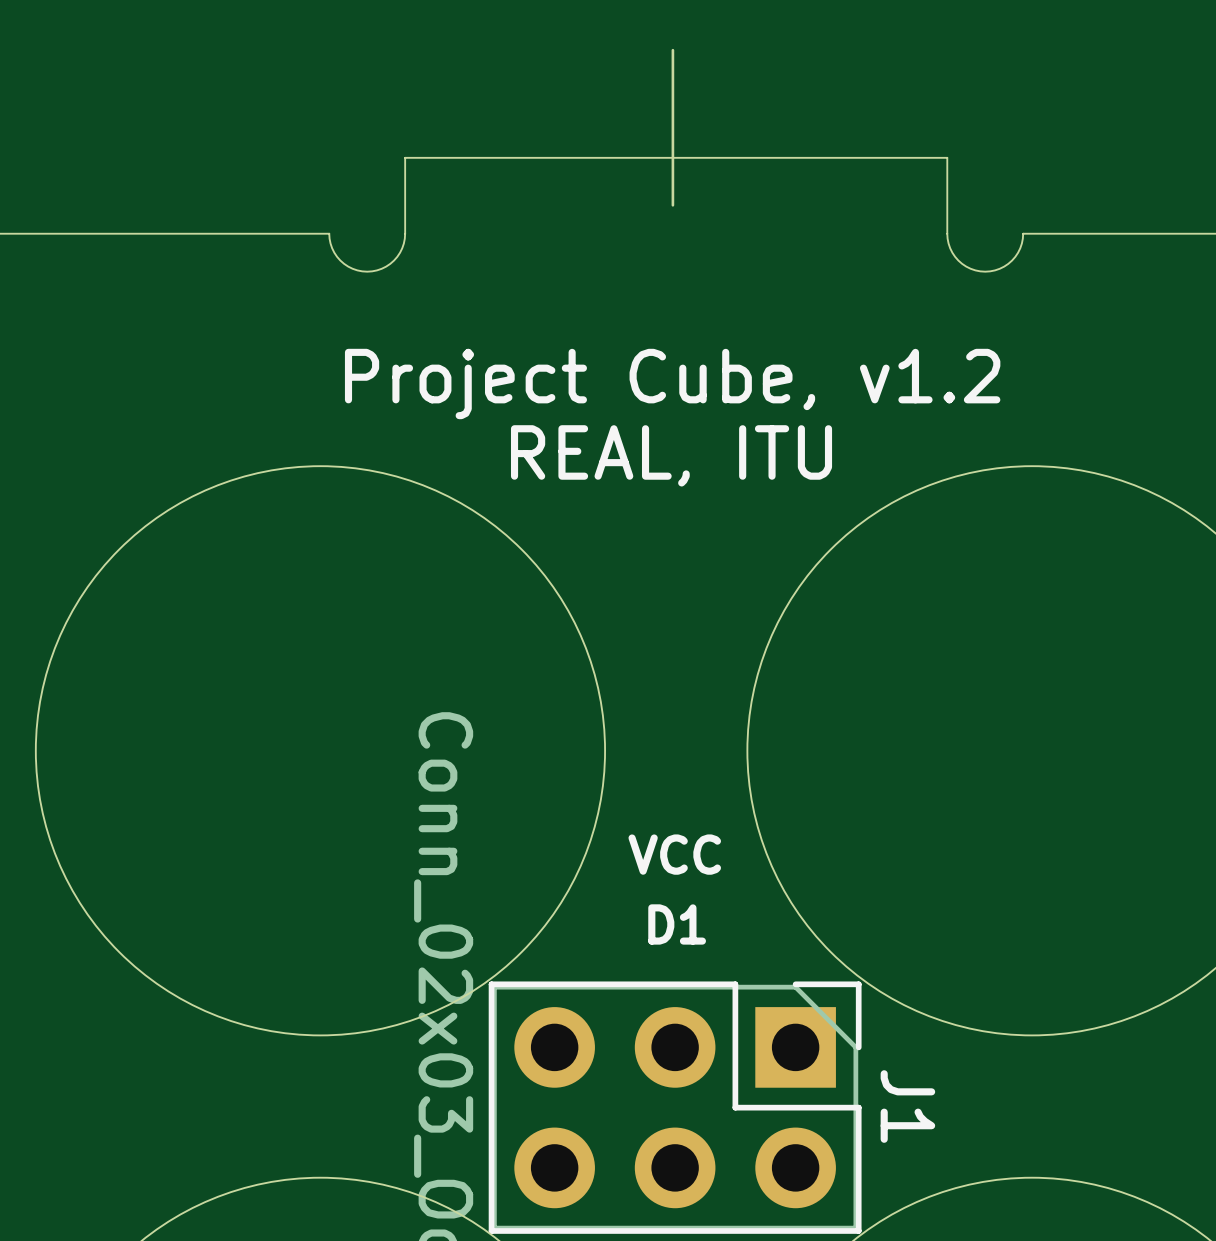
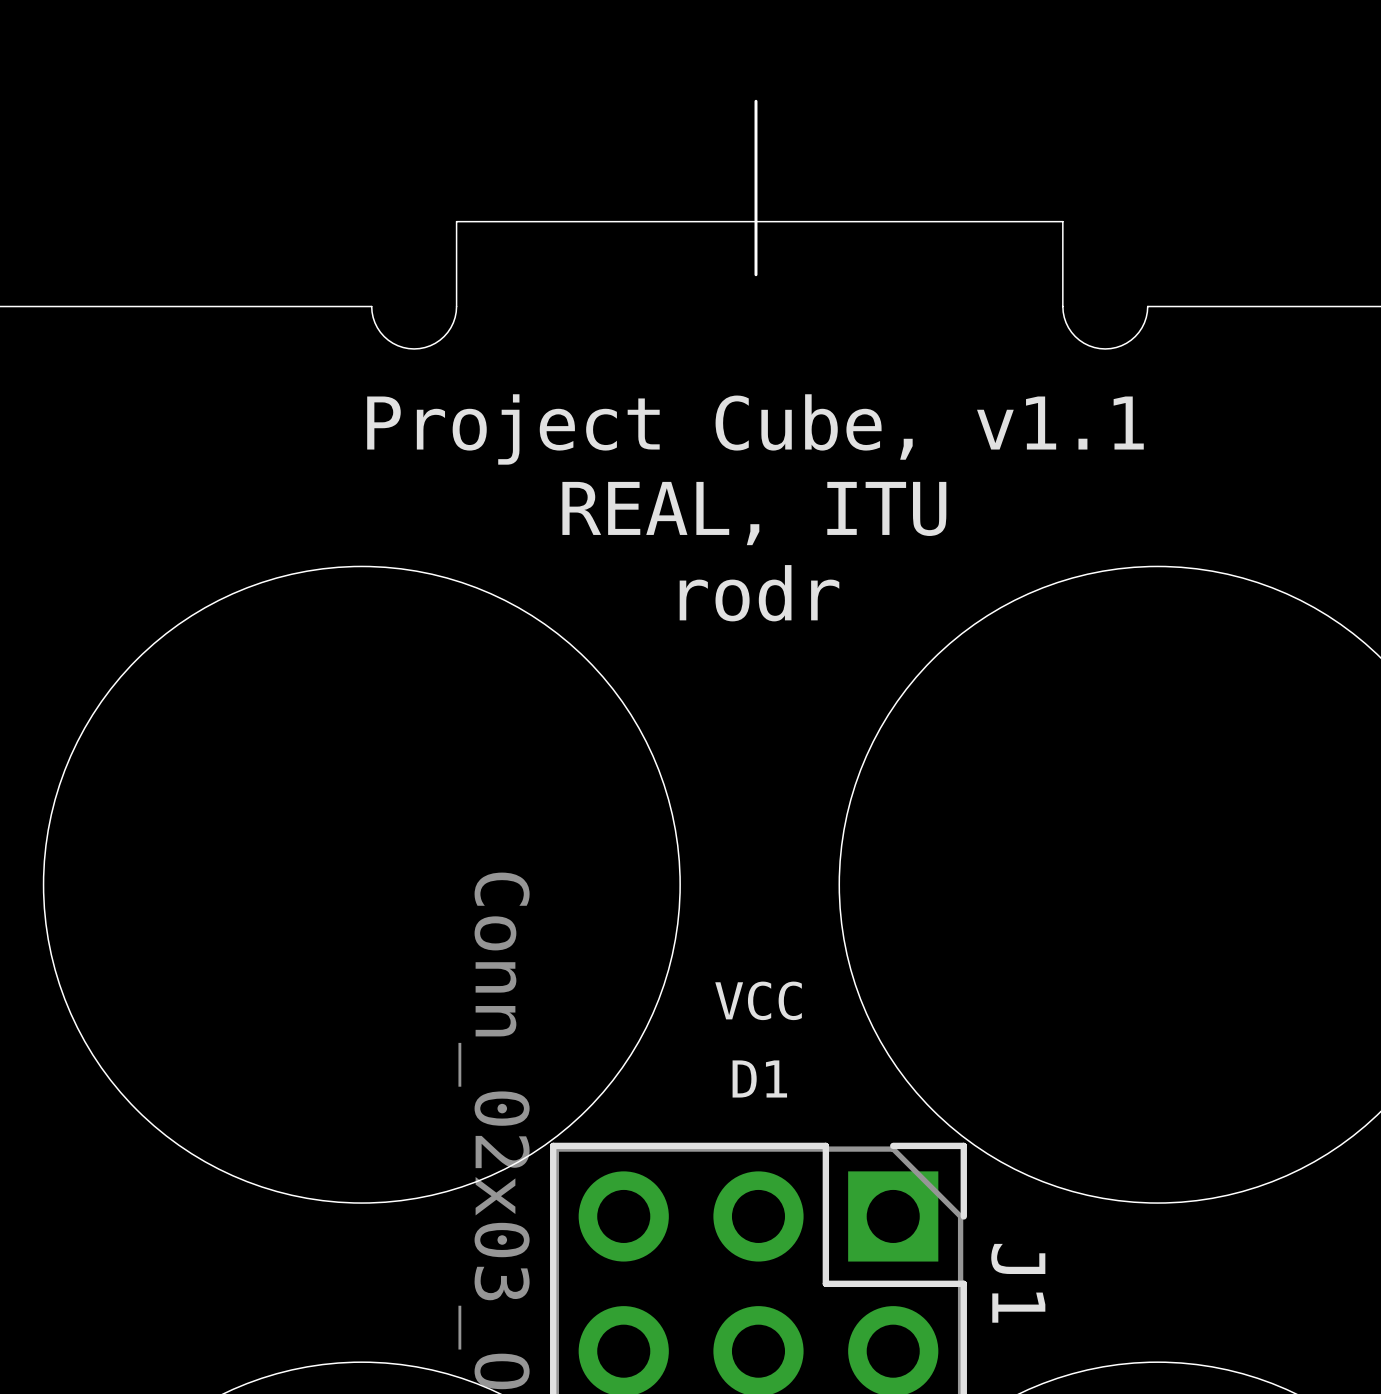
text: Project Cube, v1.2 (672, 383) -> Project Cube, v1.1 (755, 429)
text position: REAL, ITU (671, 455) -> REAL, ITU (754, 513)
text: none -> rodr (759, 593)

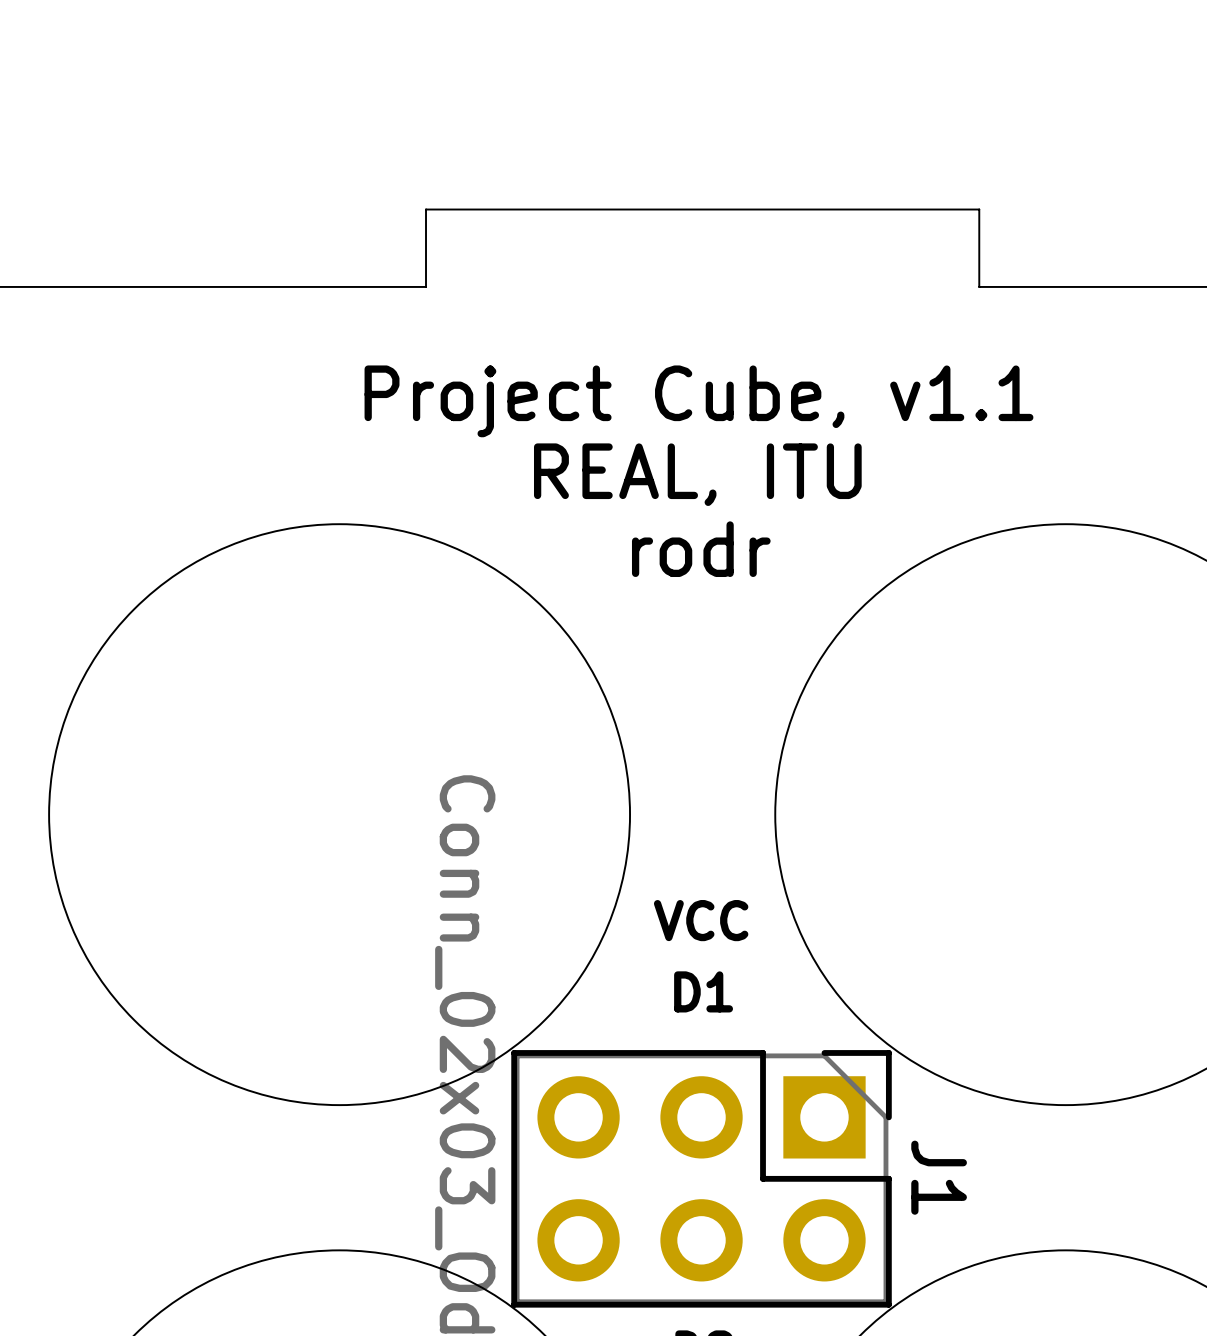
board edge: (755, 101) (755, 274) -> none
board edge: (456, 306) (453, 322) (444, 336) (430, 345) (414, 348) (397, 345) (384, 336) (374, 322) (371, 306) -> (426, 286) (348, 286)
board edge: (1147, 306) (1144, 322) (1135, 336) (1121, 345) (1105, 348) (1089, 345) (1075, 336) (1066, 322) (1062, 306) -> (1056, 286) (979, 286)

